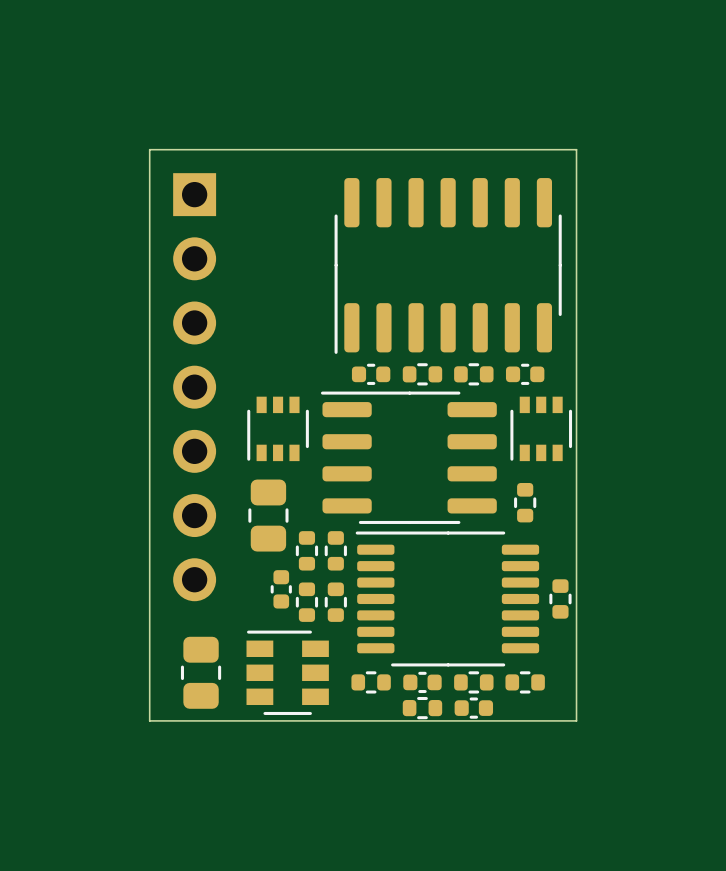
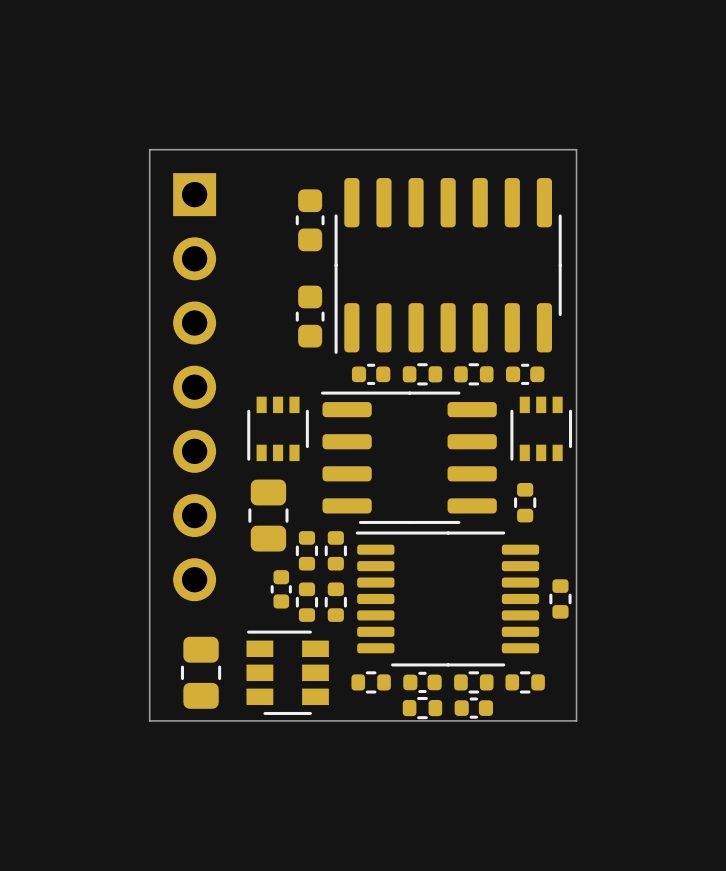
part: none -> (310, 220)
part: none -> (310, 316)

